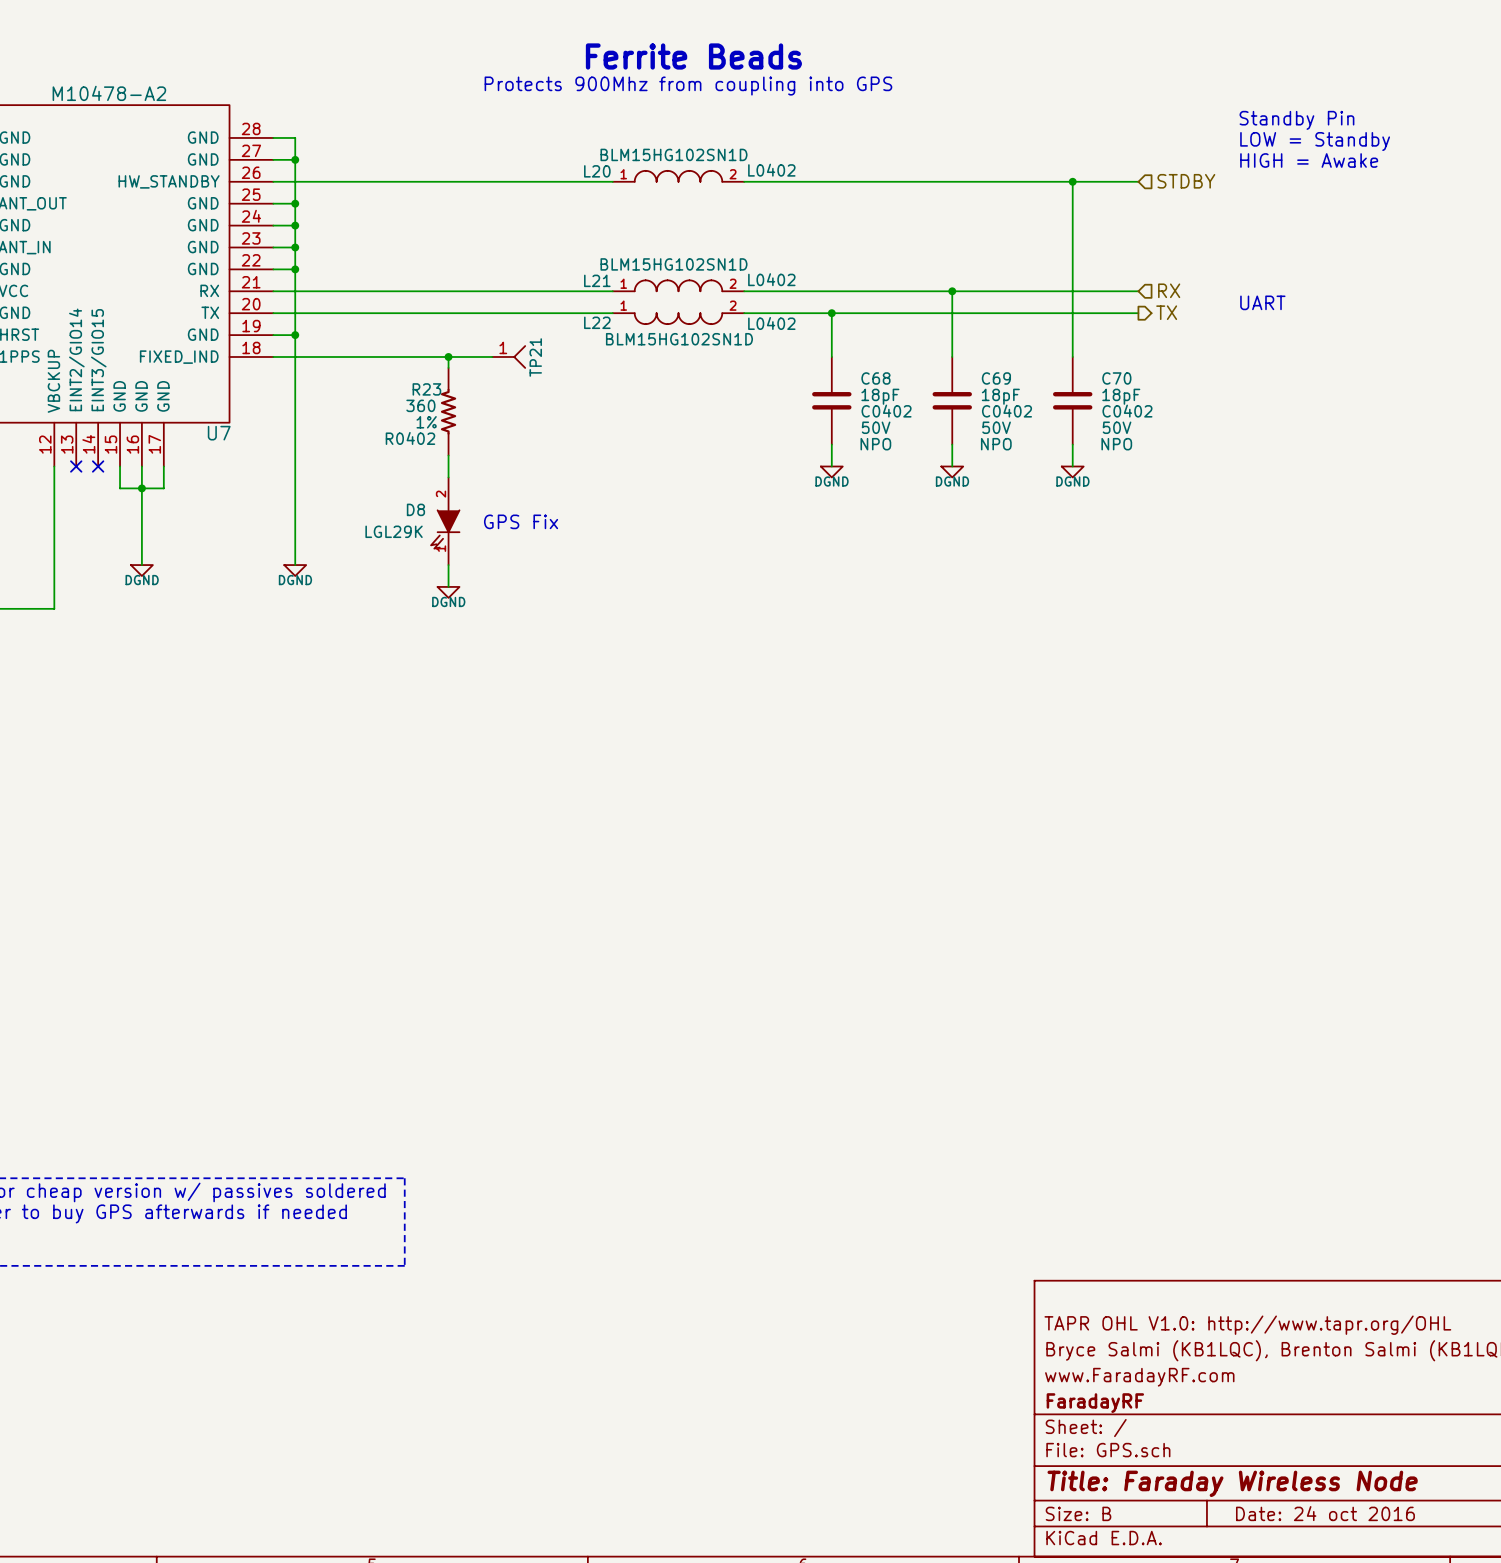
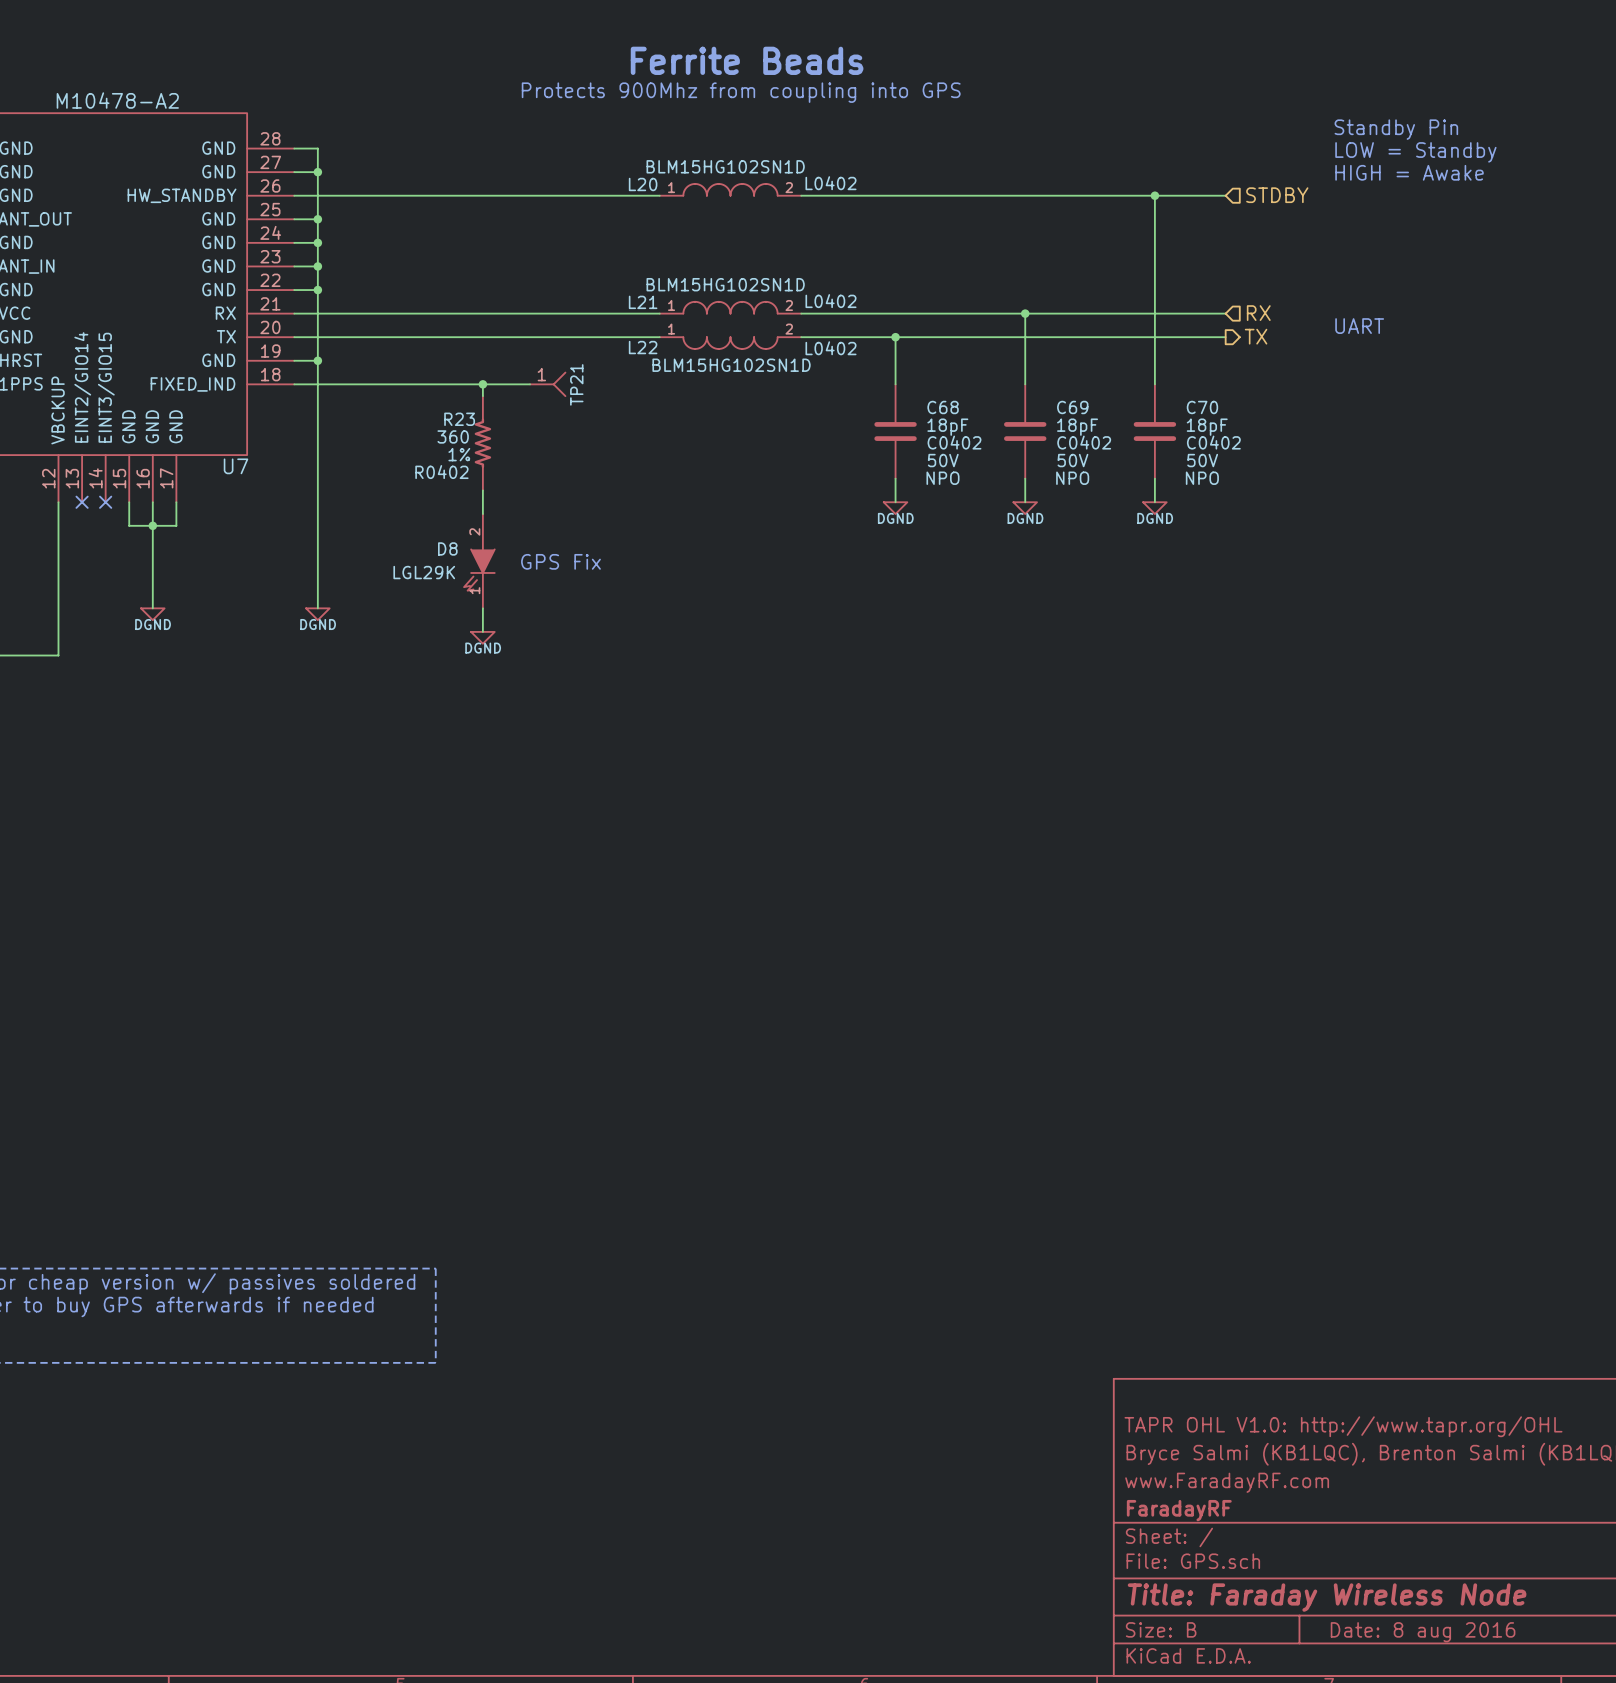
title block: Date: 24 oct 2016 (1325, 1513) -> Date: 8 aug 2016 (1423, 1632)

